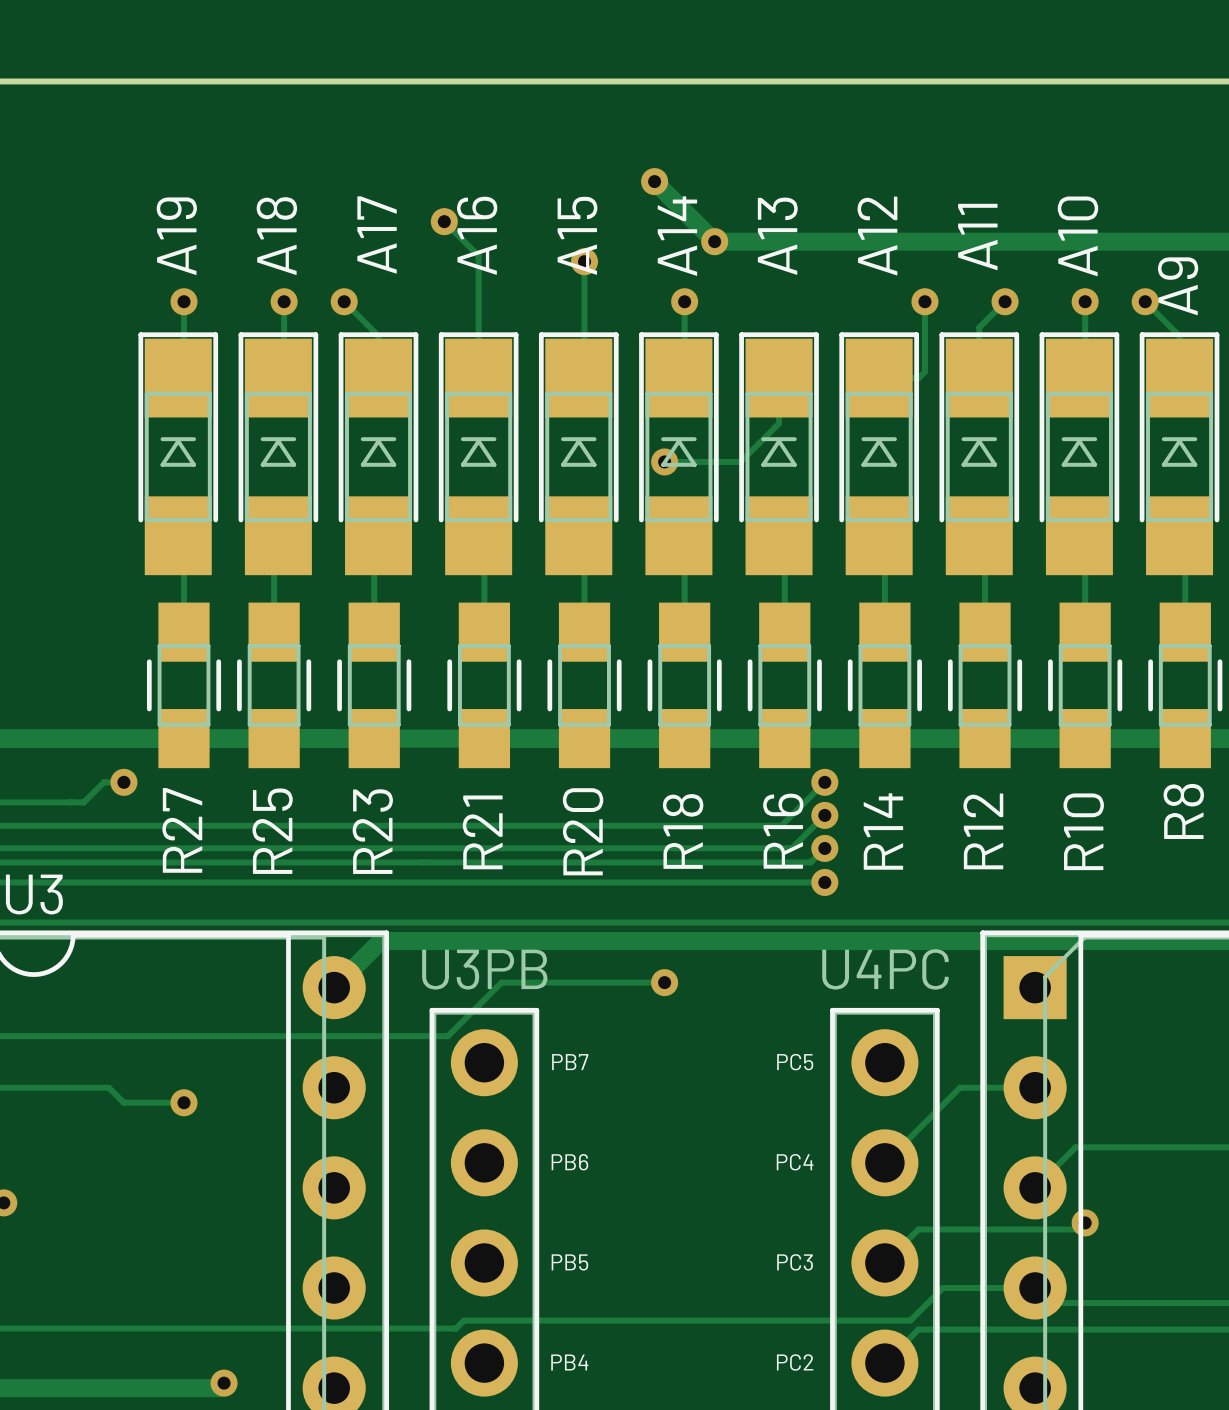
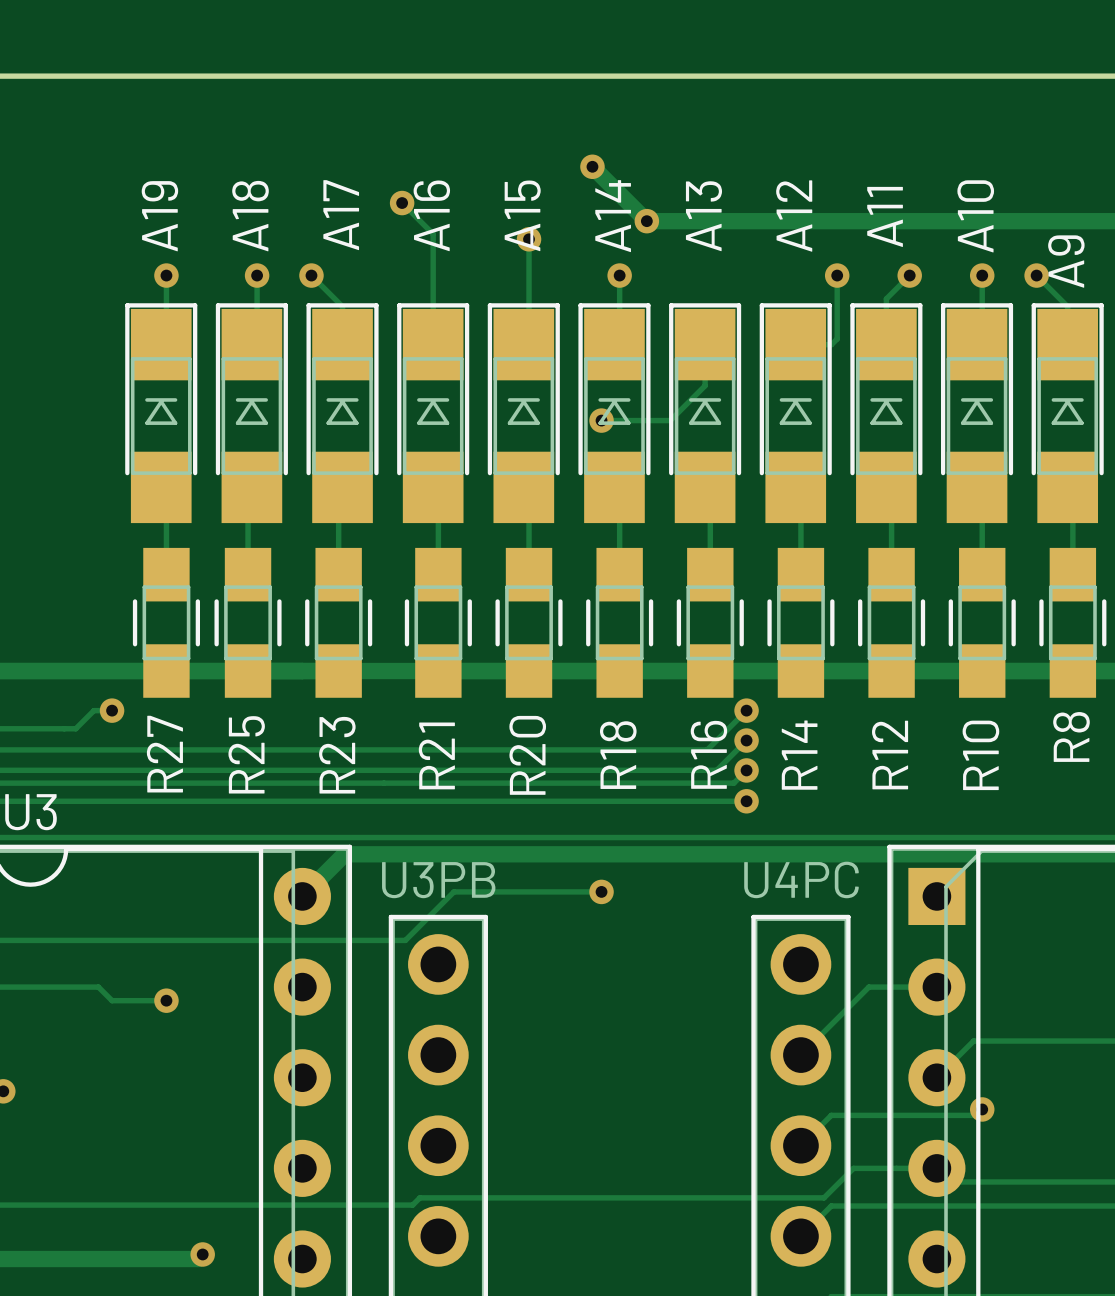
text: PB7 (570, 1062) -> none
text: PC5 (795, 1062) -> none
text: PB6 (569, 1162) -> none
text: PC4 (795, 1162) -> none
text: PB5 (569, 1262) -> none
text: PC3 (795, 1262) -> none
text: PB4 (569, 1362) -> none
text: PC2 (795, 1362) -> none

